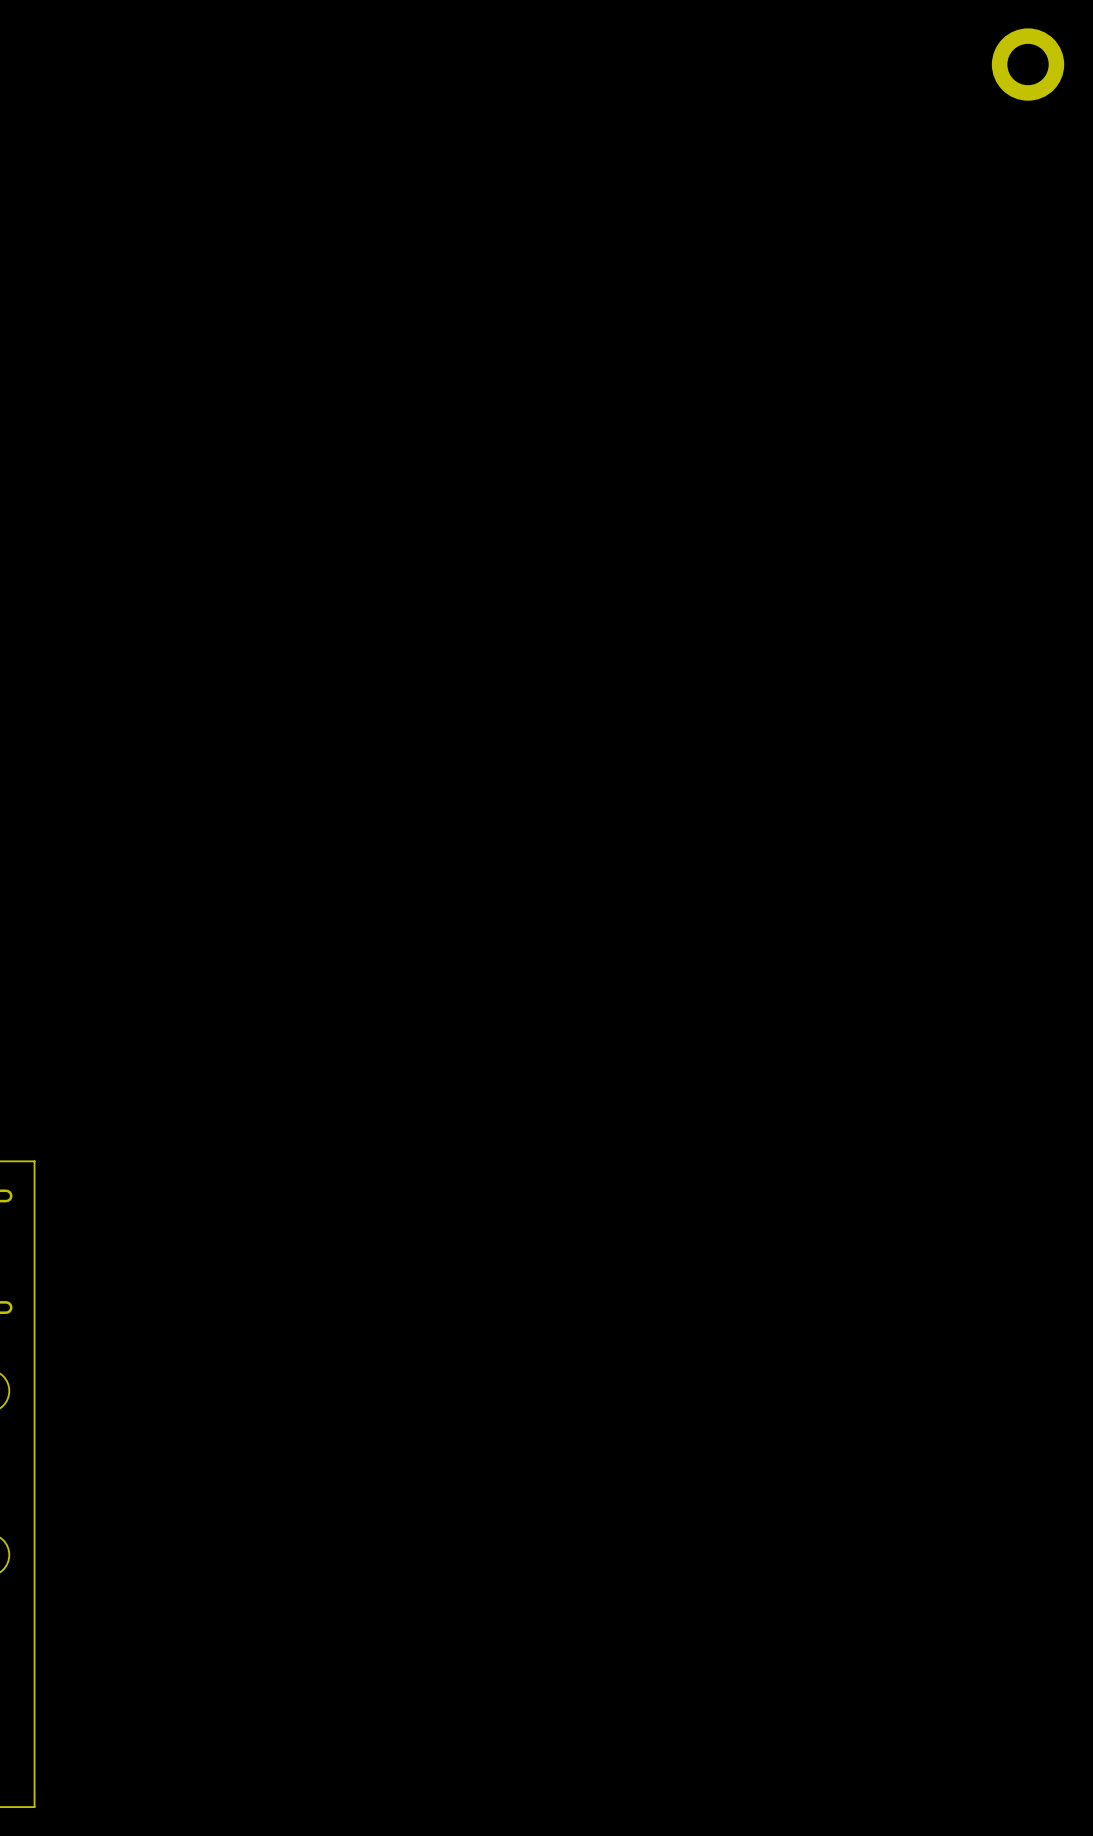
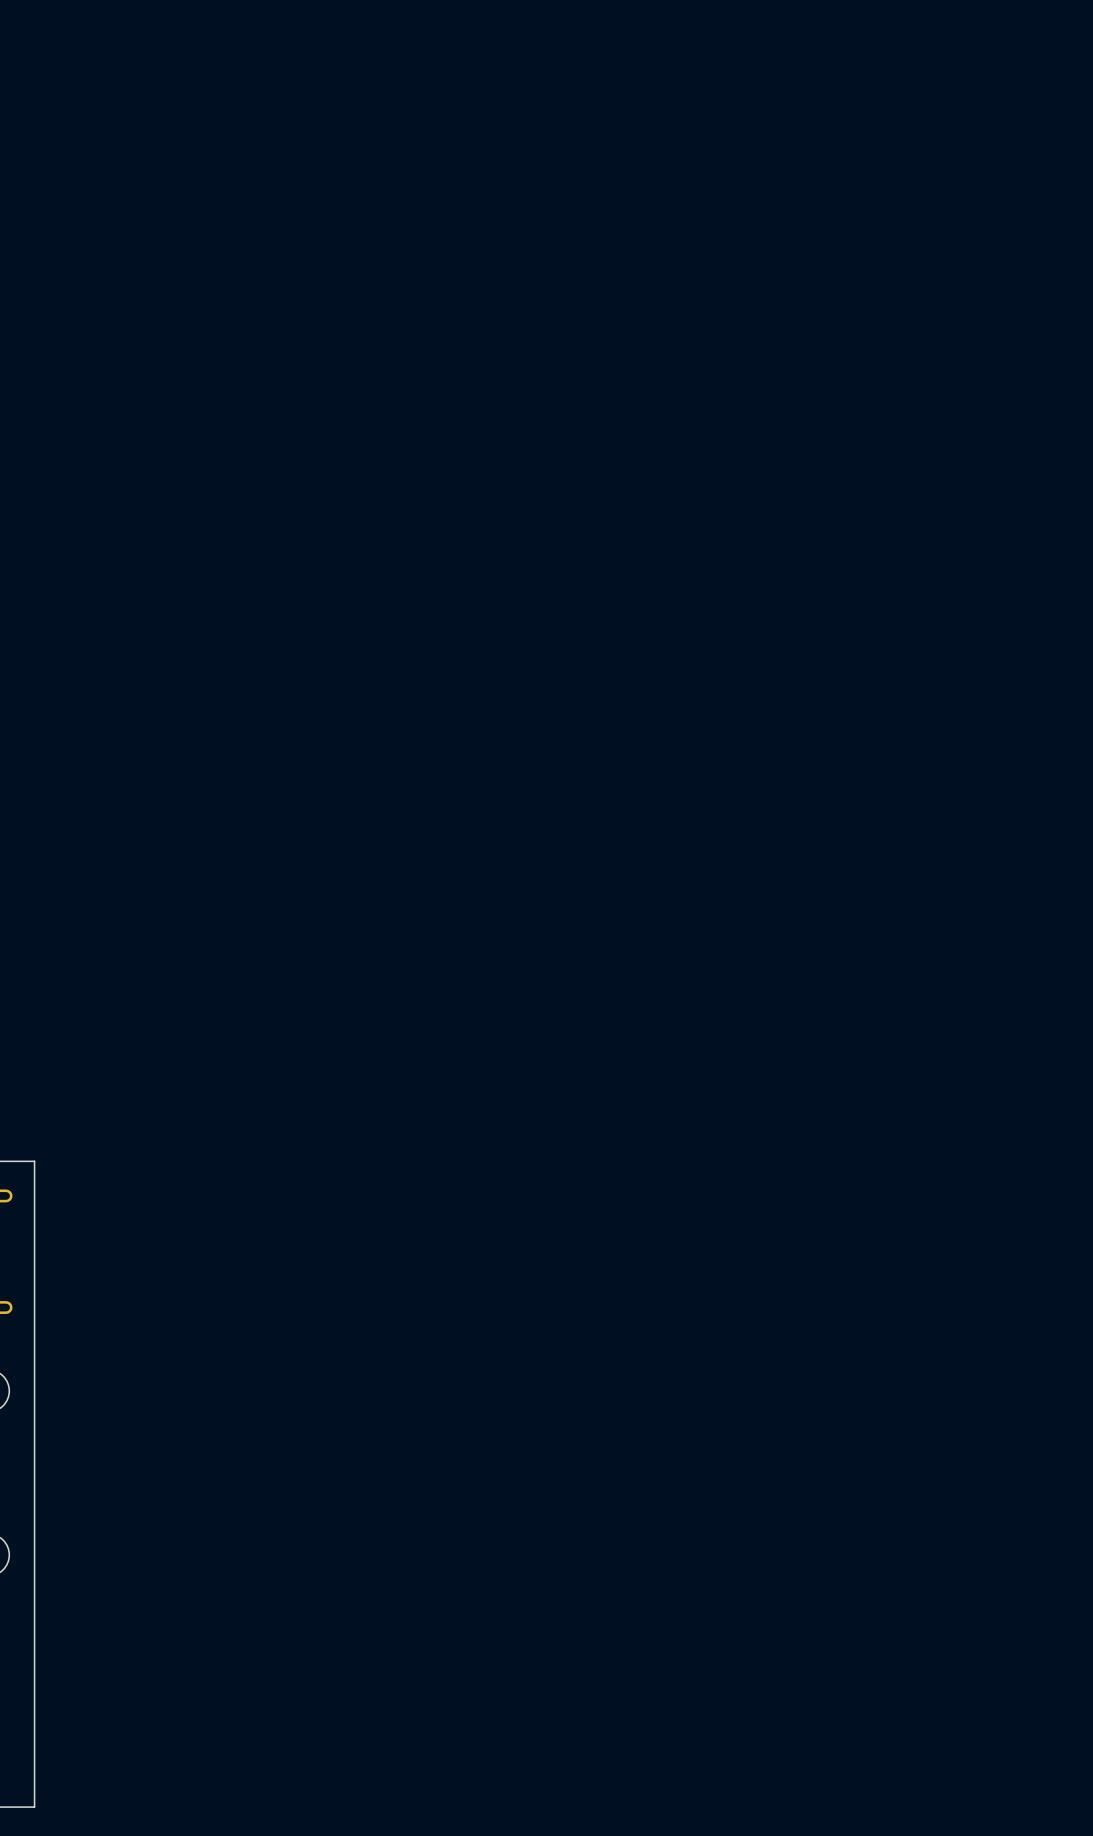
part: (1028, 64) -> none

